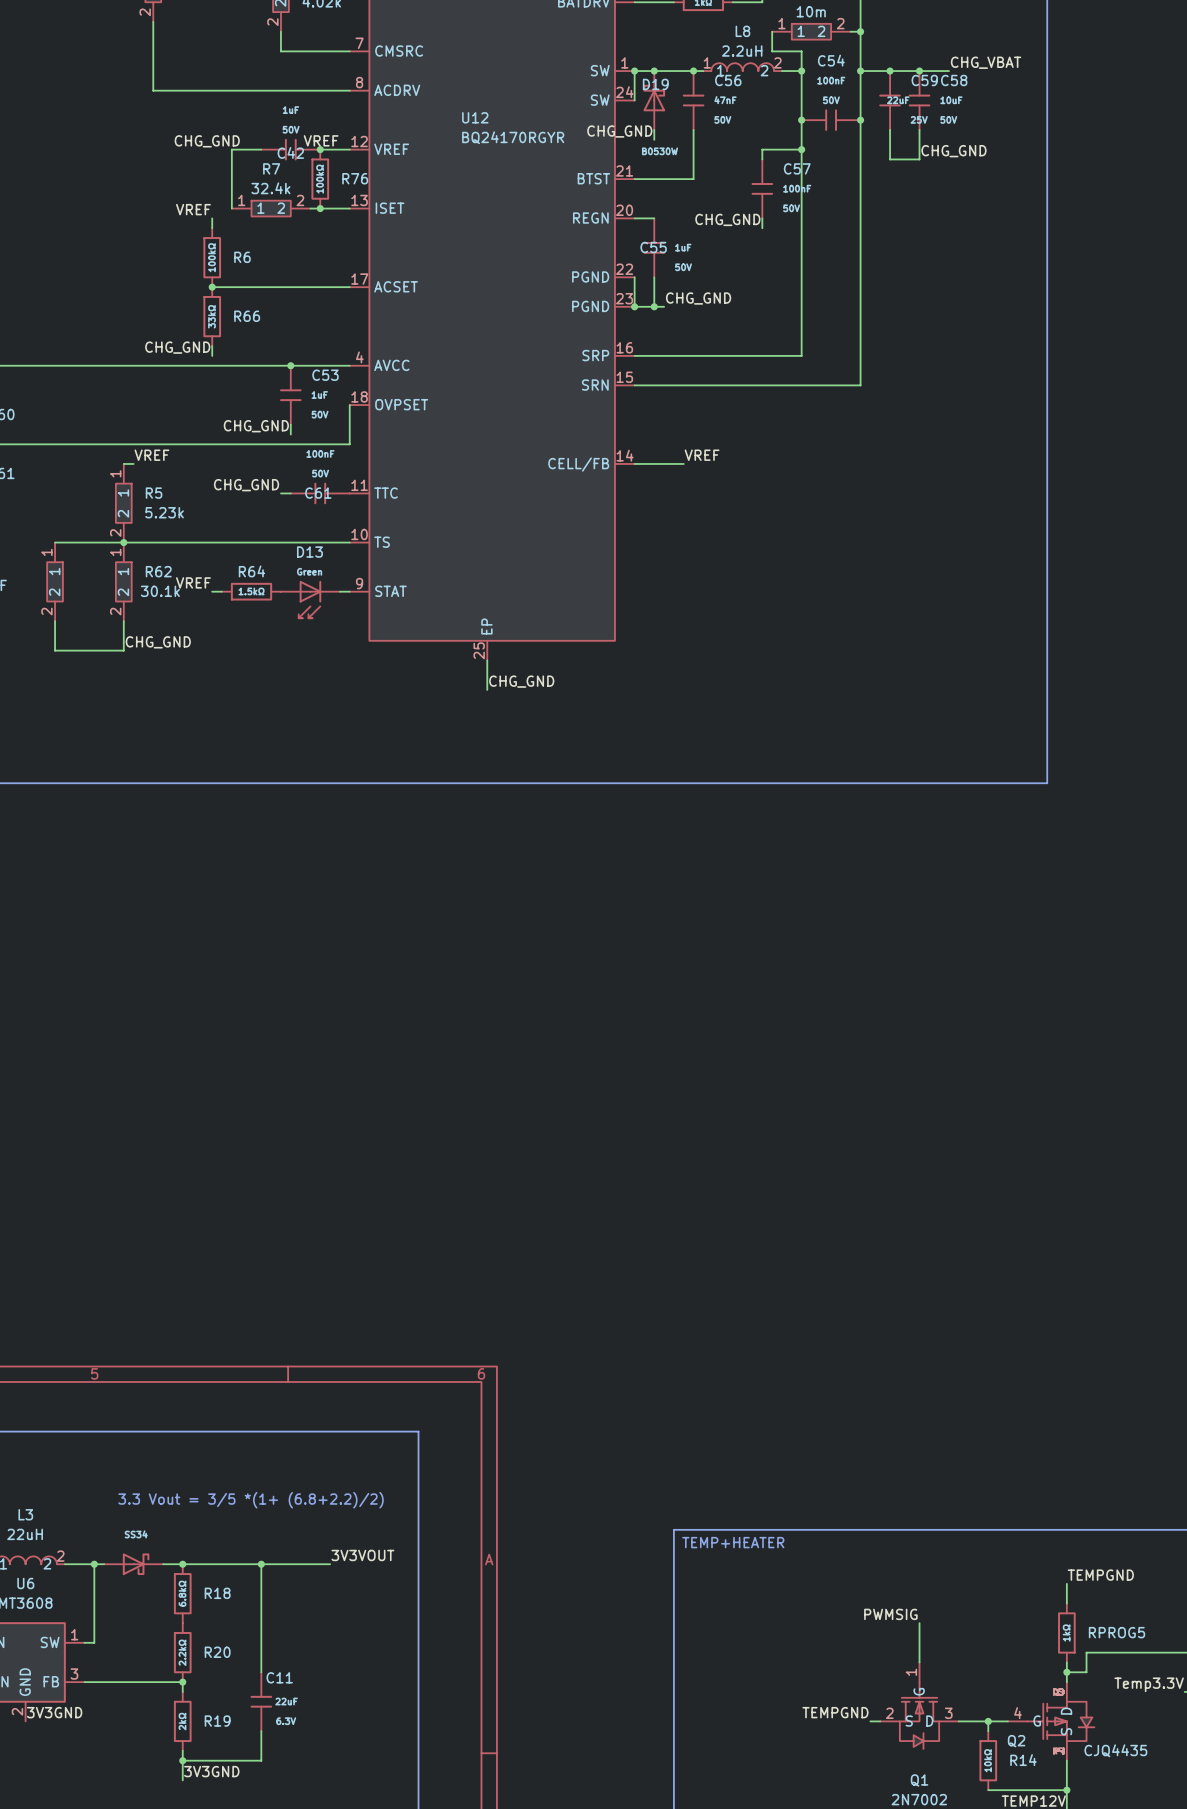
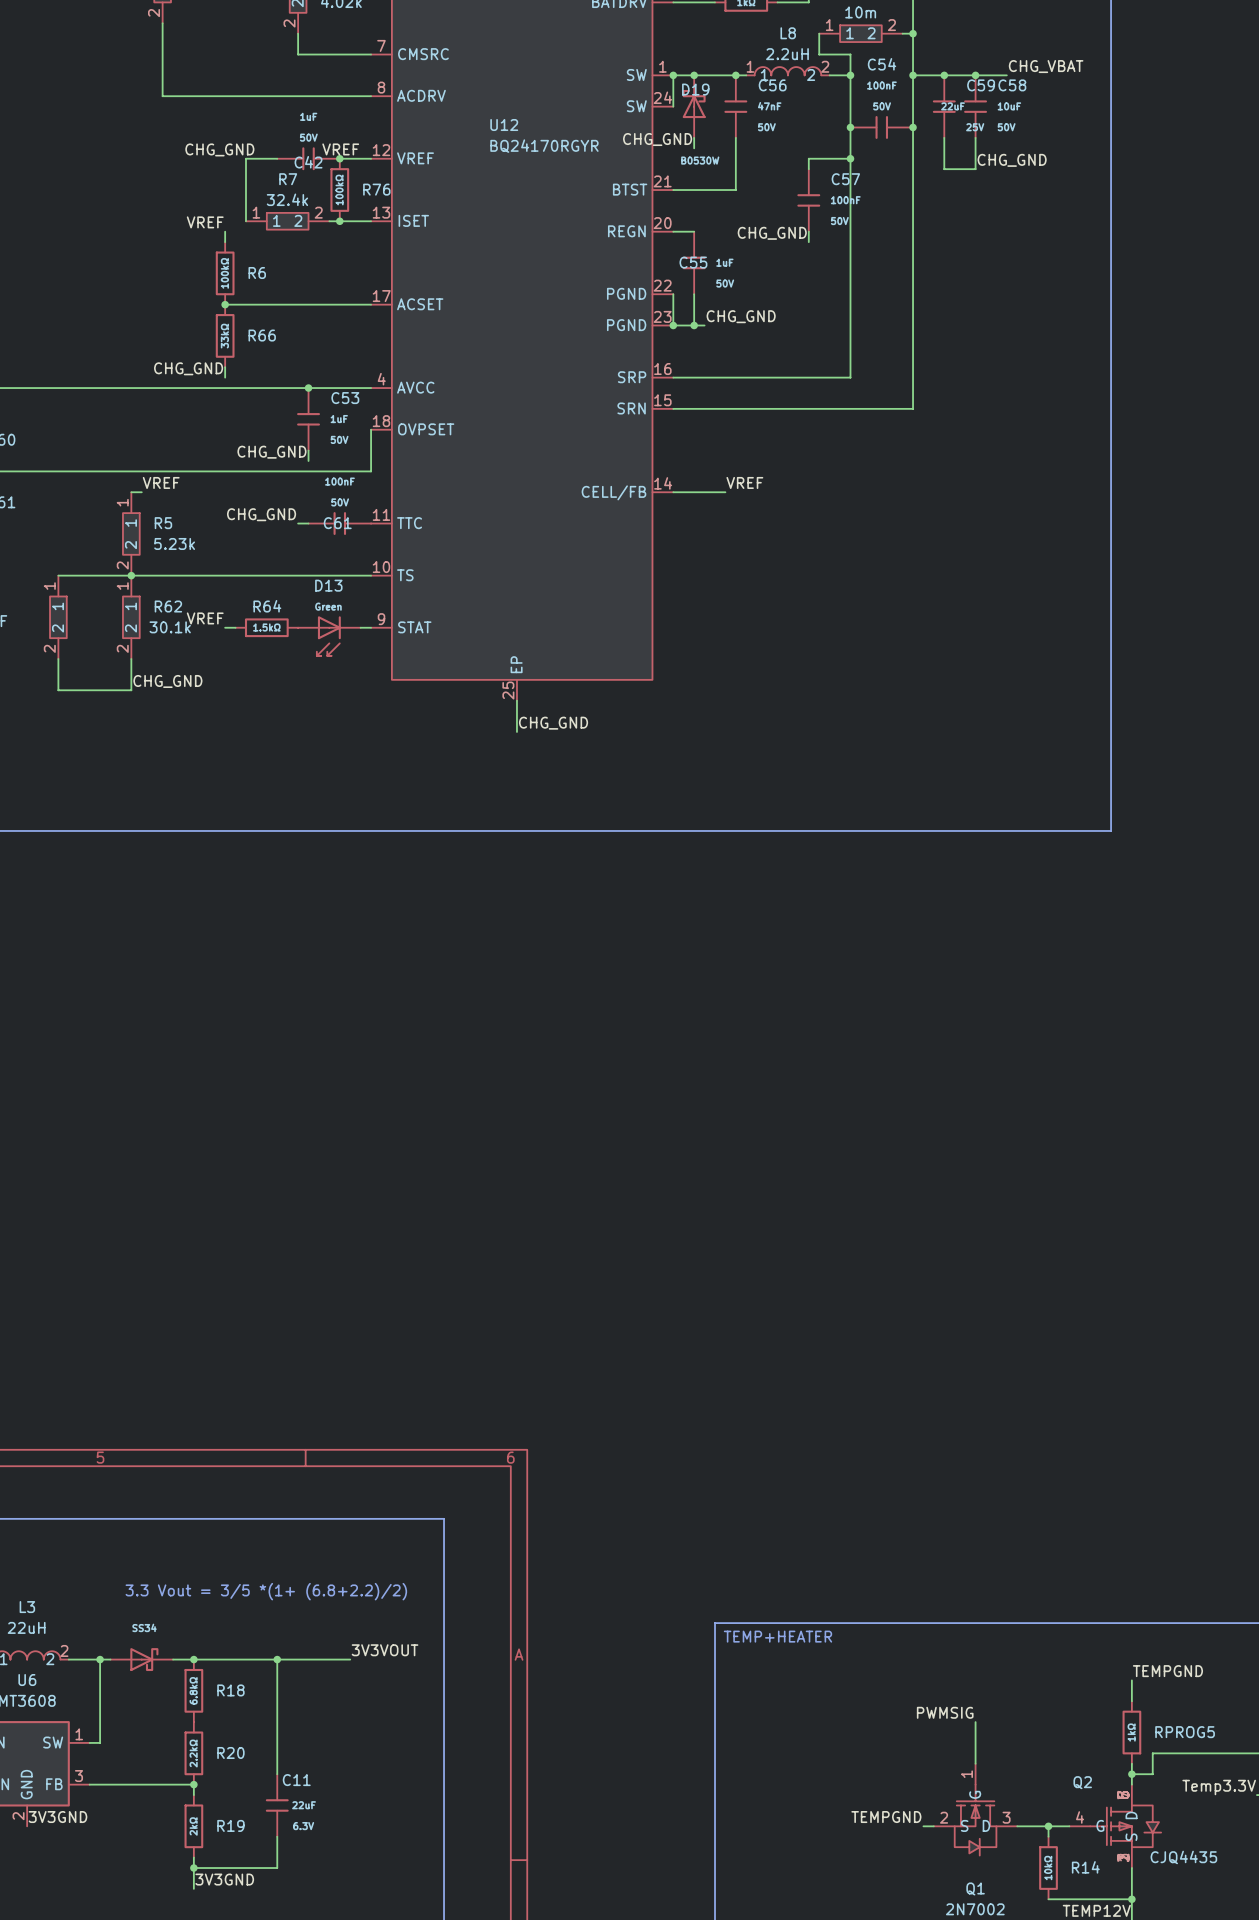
Q2 name position: Q2 (1016, 1741) -> Q2 (1082, 1782)

